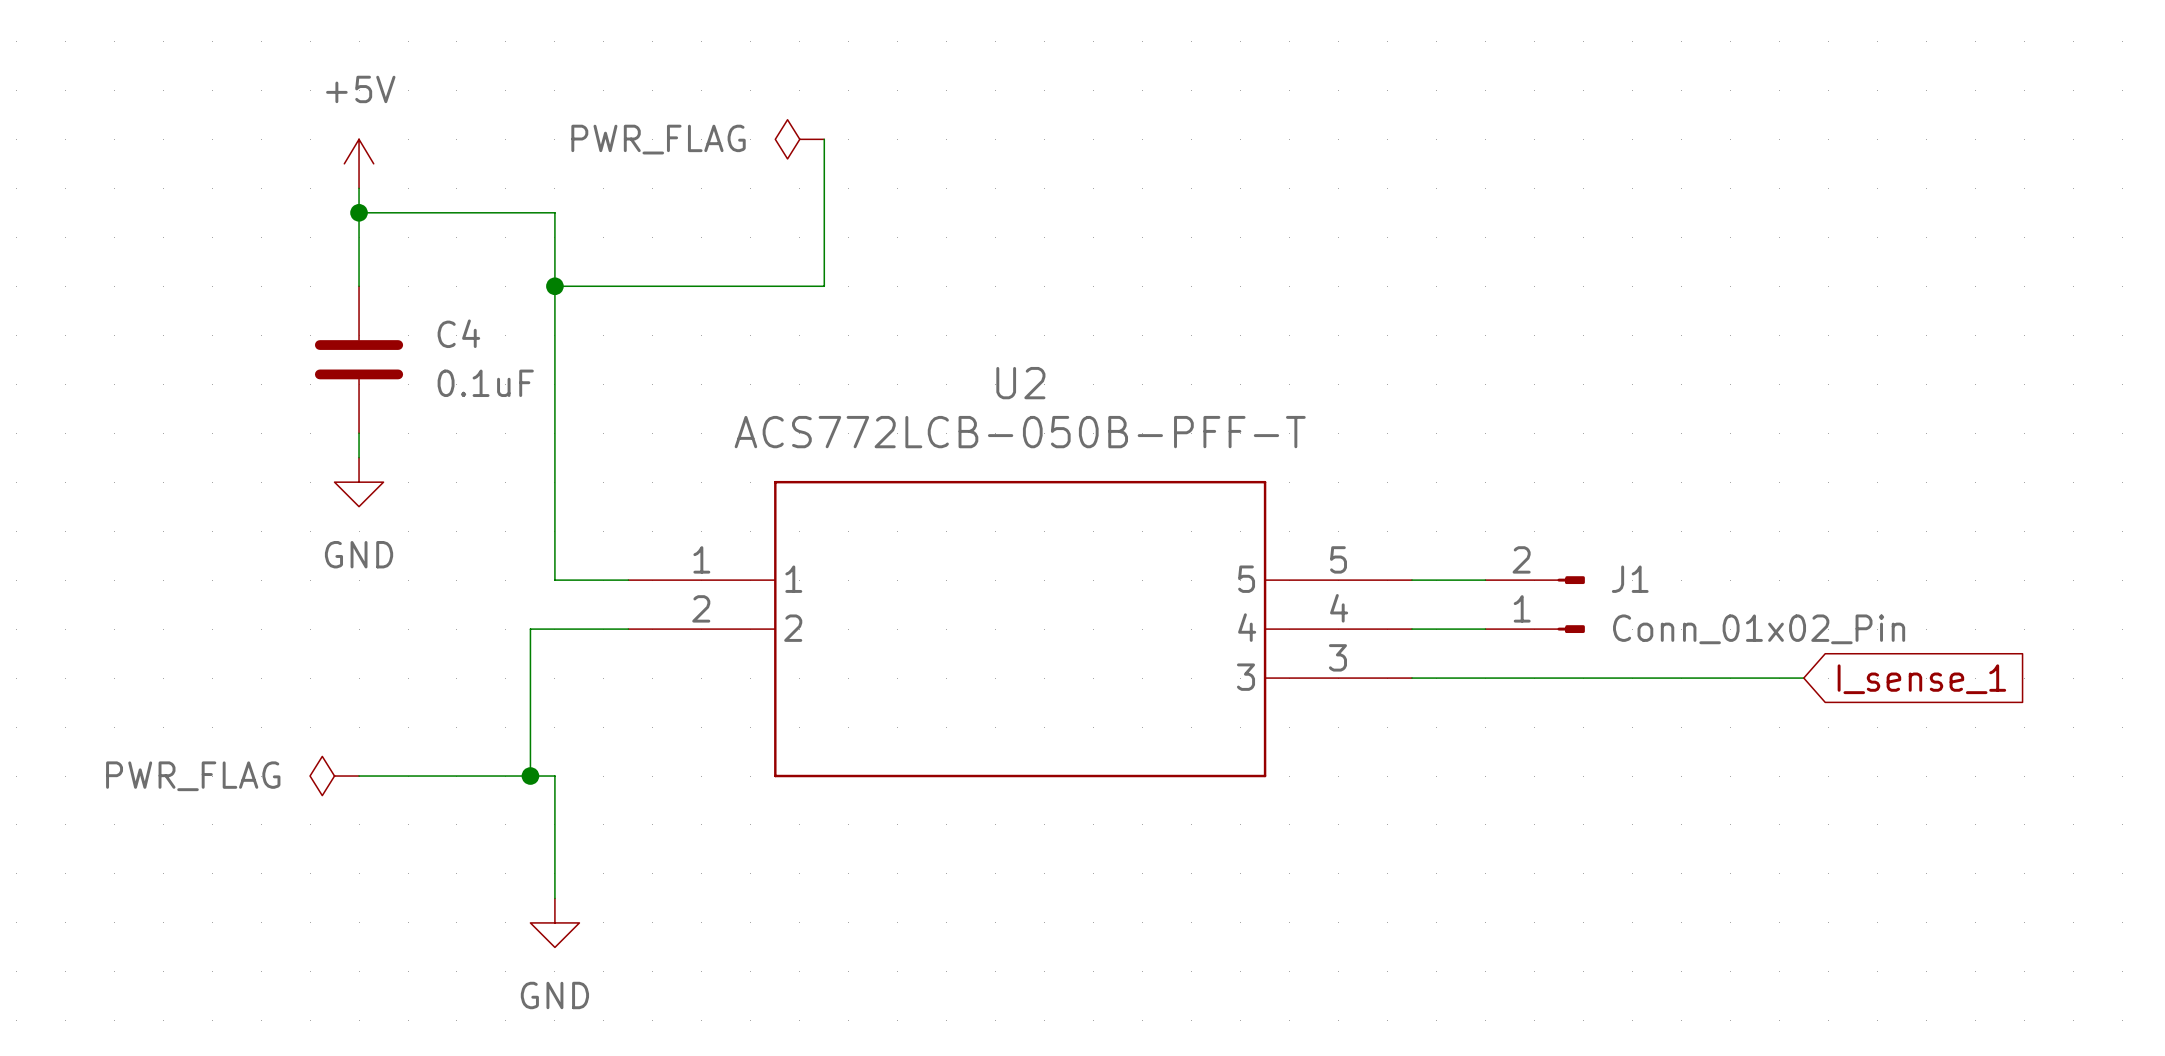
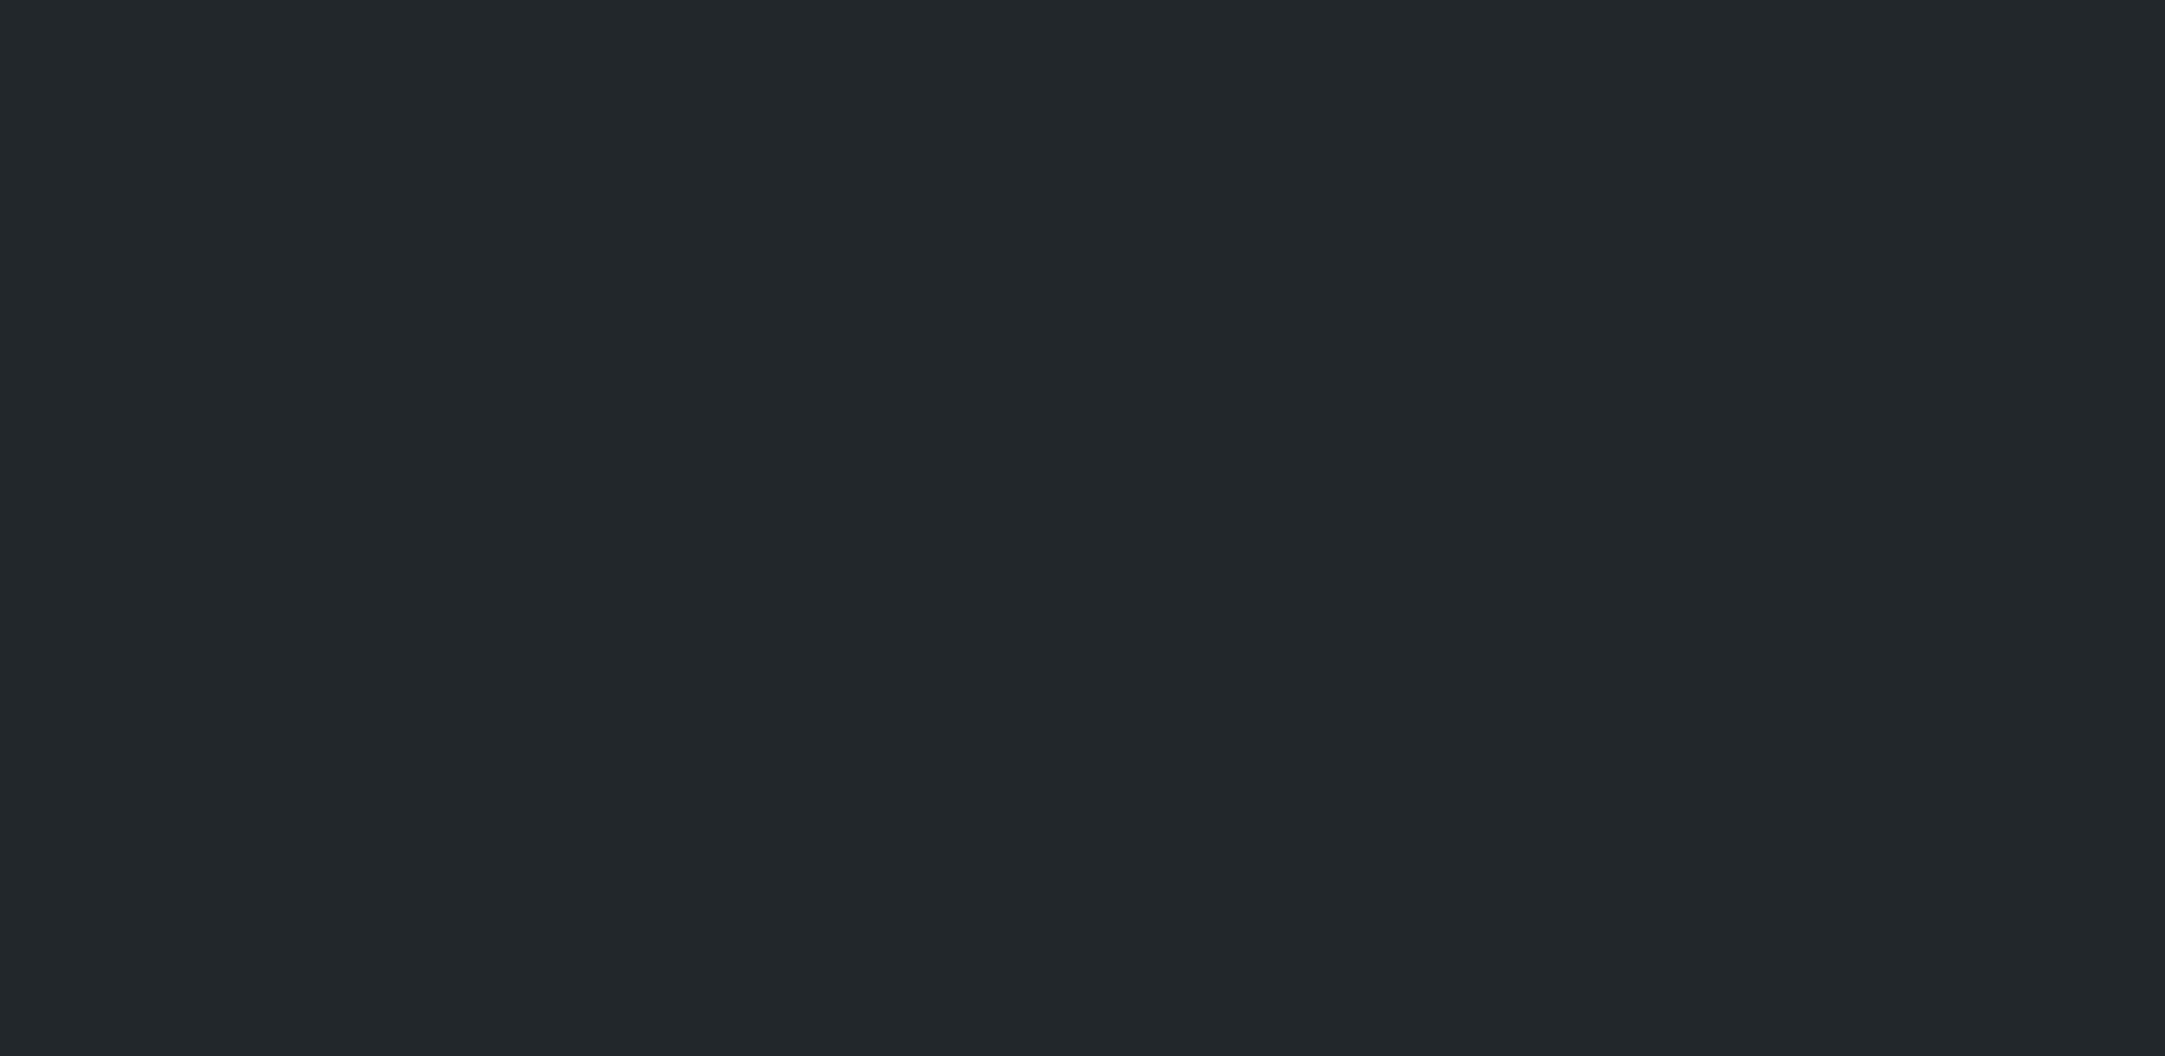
power symbol: PWR_FLAG (799, 139) -> none
wire: (824, 139) (824, 286) (554, 286) -> none
power symbol: +5V (359, 163) -> none
wire: (359, 188) (359, 286) -> none
wire: (359, 212) (554, 212) (554, 580) (628, 580) -> none
junction: (359, 212) -> none
junction: (554, 286) -> none
C4: 0.1uF (359, 359) -> none
wire: (359, 433) (359, 457) -> none
power symbol: GND (359, 482) -> none
wire: (1411, 580) (1485, 580) -> none
J1: Conn_01x02_Pin (1535, 604) -> none
wire: (628, 629) (530, 629) (530, 776) -> none
U2: ACS772LCB-050B-PFF-T (1020, 629) -> none
wire: (1411, 629) (1485, 629) -> none
wire: (1411, 678) (1803, 678) -> none
global label: I_sense_1 (1921, 679) -> none
power symbol: PWR_FLAG (334, 776) -> none
wire: (359, 776) (554, 776) (554, 898) -> none
junction: (530, 776) -> none
power symbol: GND (554, 922) -> none

